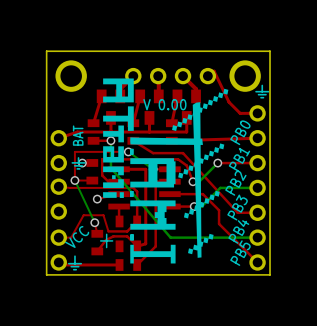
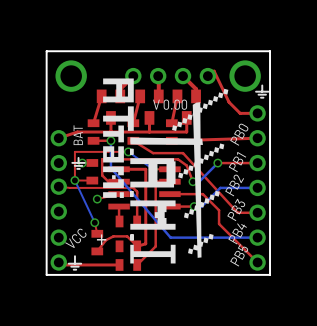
top track: (137, 221) (127, 231) (108, 231) (103, 215) (83, 215) (71, 237) (58, 237) -> none

